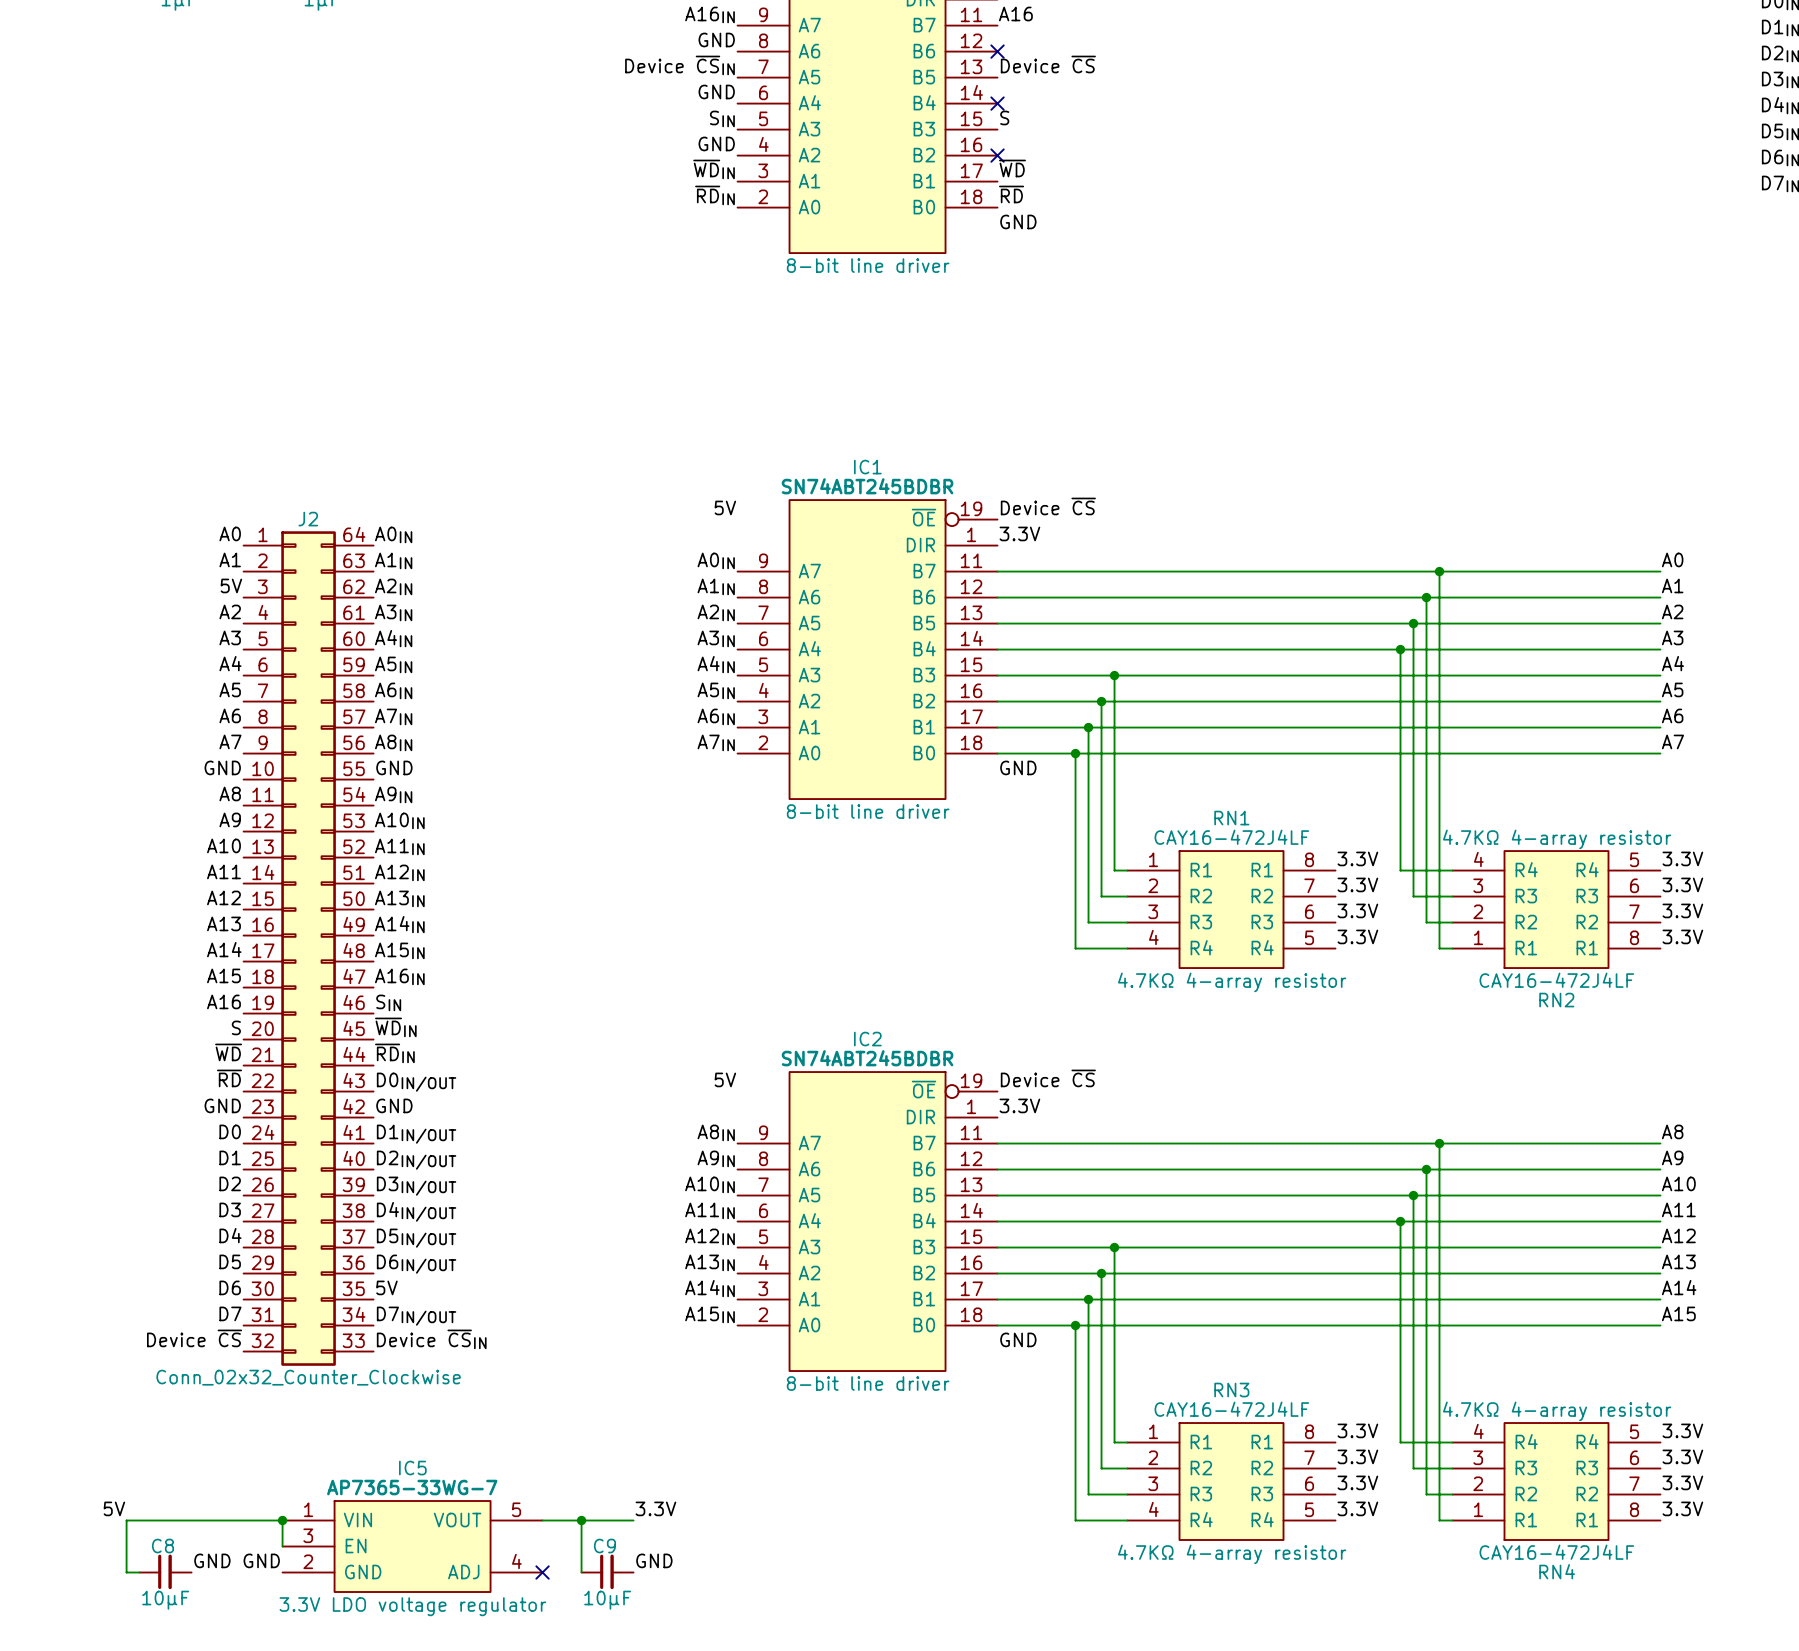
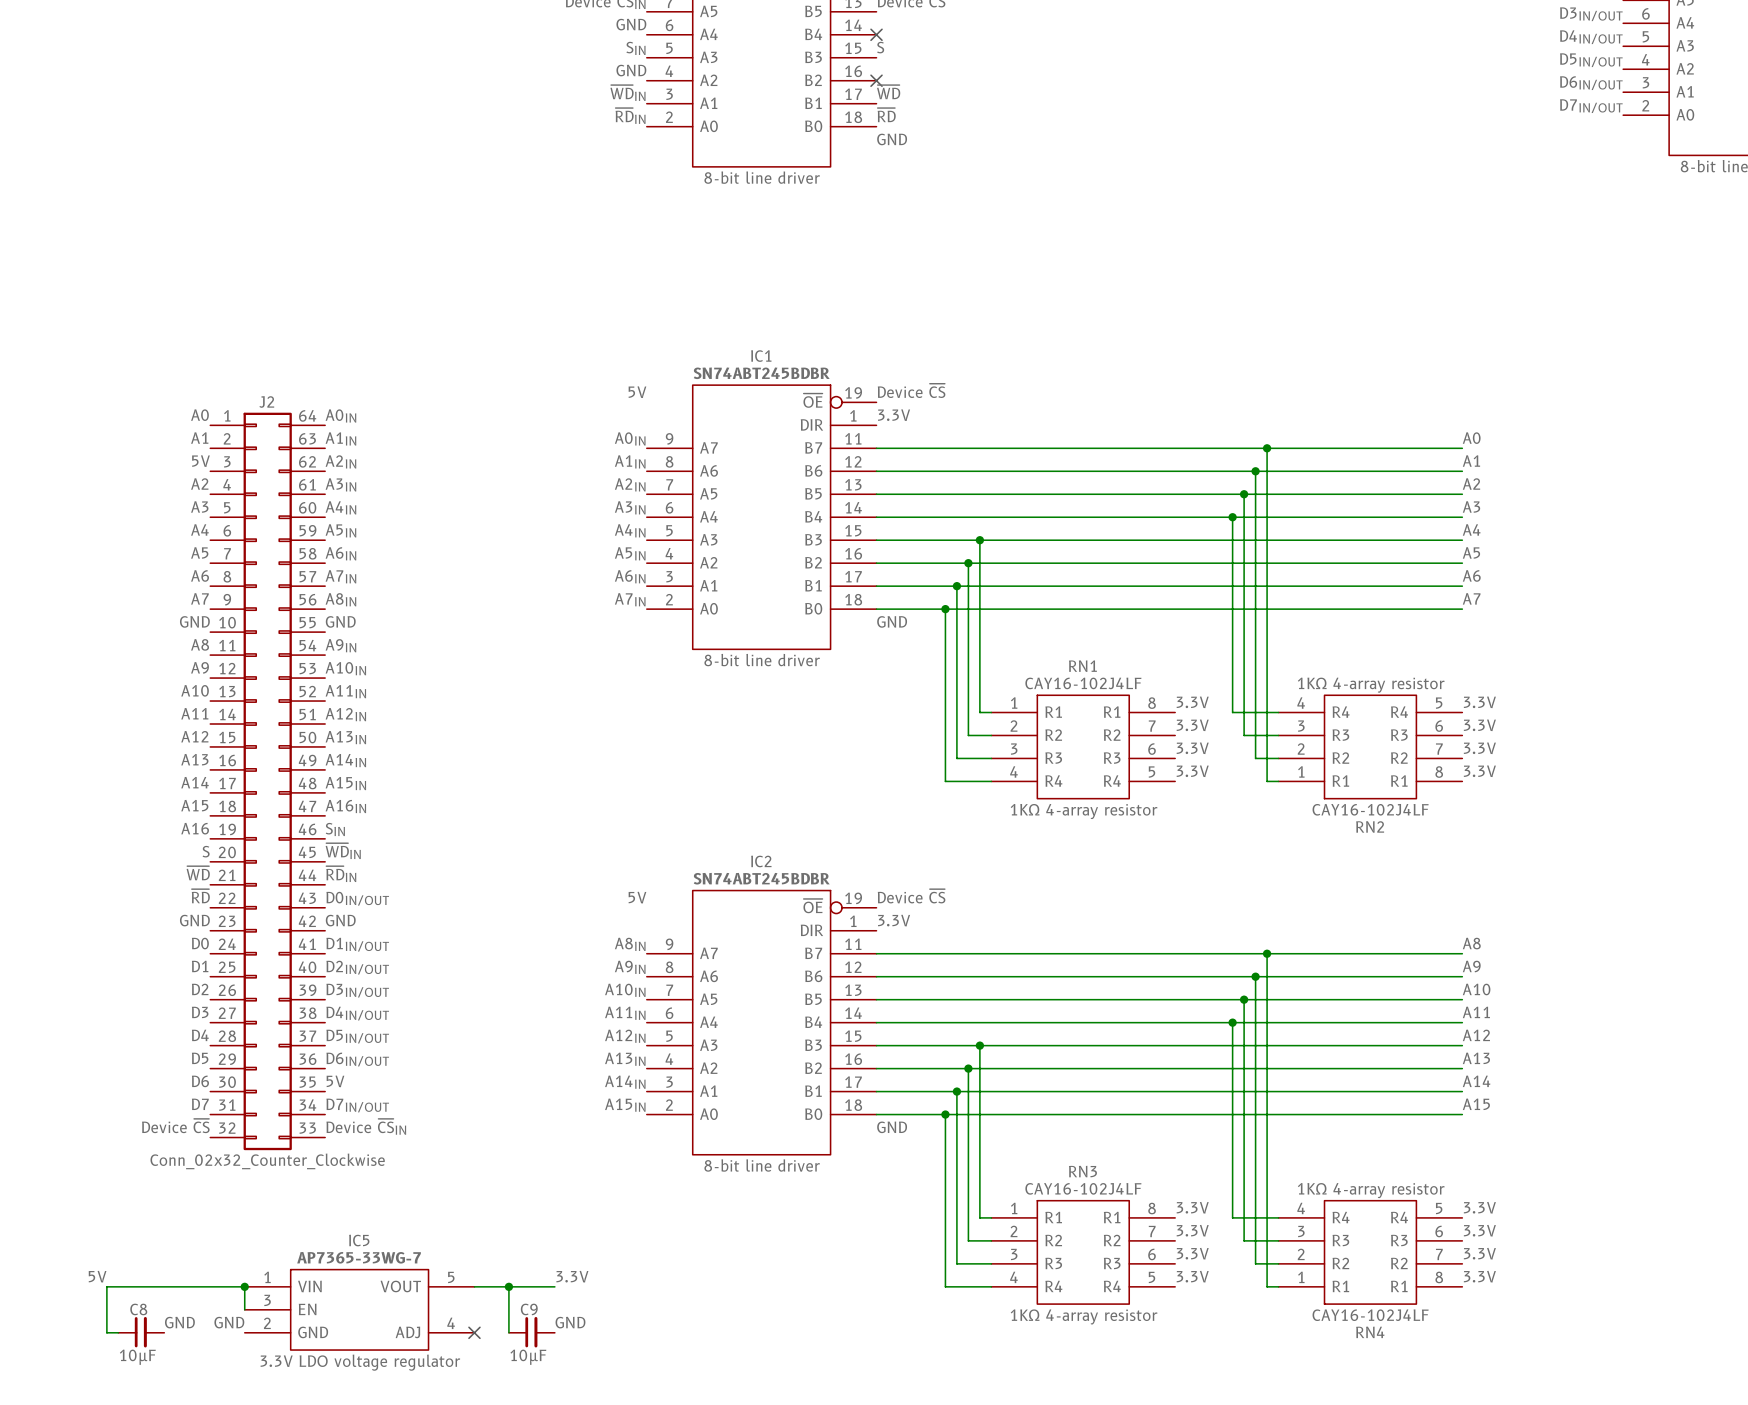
RN1 value: CAY16-472J4LF (1231, 837) -> CAY16-102J4LF (1083, 683)
RN2 text: 4.7KΩ 4-array resistor (1557, 839) -> 1KΩ 4-array resistor (1371, 685)
RN2 value: CAY16-472J4LF (1556, 980) -> CAY16-102J4LF (1370, 809)
RN1 text: 4.7KΩ 4-array resistor (1232, 982) -> 1KΩ 4-array resistor (1084, 811)
RN3 value: CAY16-472J4LF (1231, 1409) -> CAY16-102J4LF (1083, 1188)
RN4 text: 4.7KΩ 4-array resistor (1557, 1411) -> 1KΩ 4-array resistor (1371, 1190)
RN4 value: CAY16-472J4LF (1556, 1552) -> CAY16-102J4LF (1370, 1315)
RN3 text: 4.7KΩ 4-array resistor (1232, 1554) -> 1KΩ 4-array resistor (1084, 1316)

